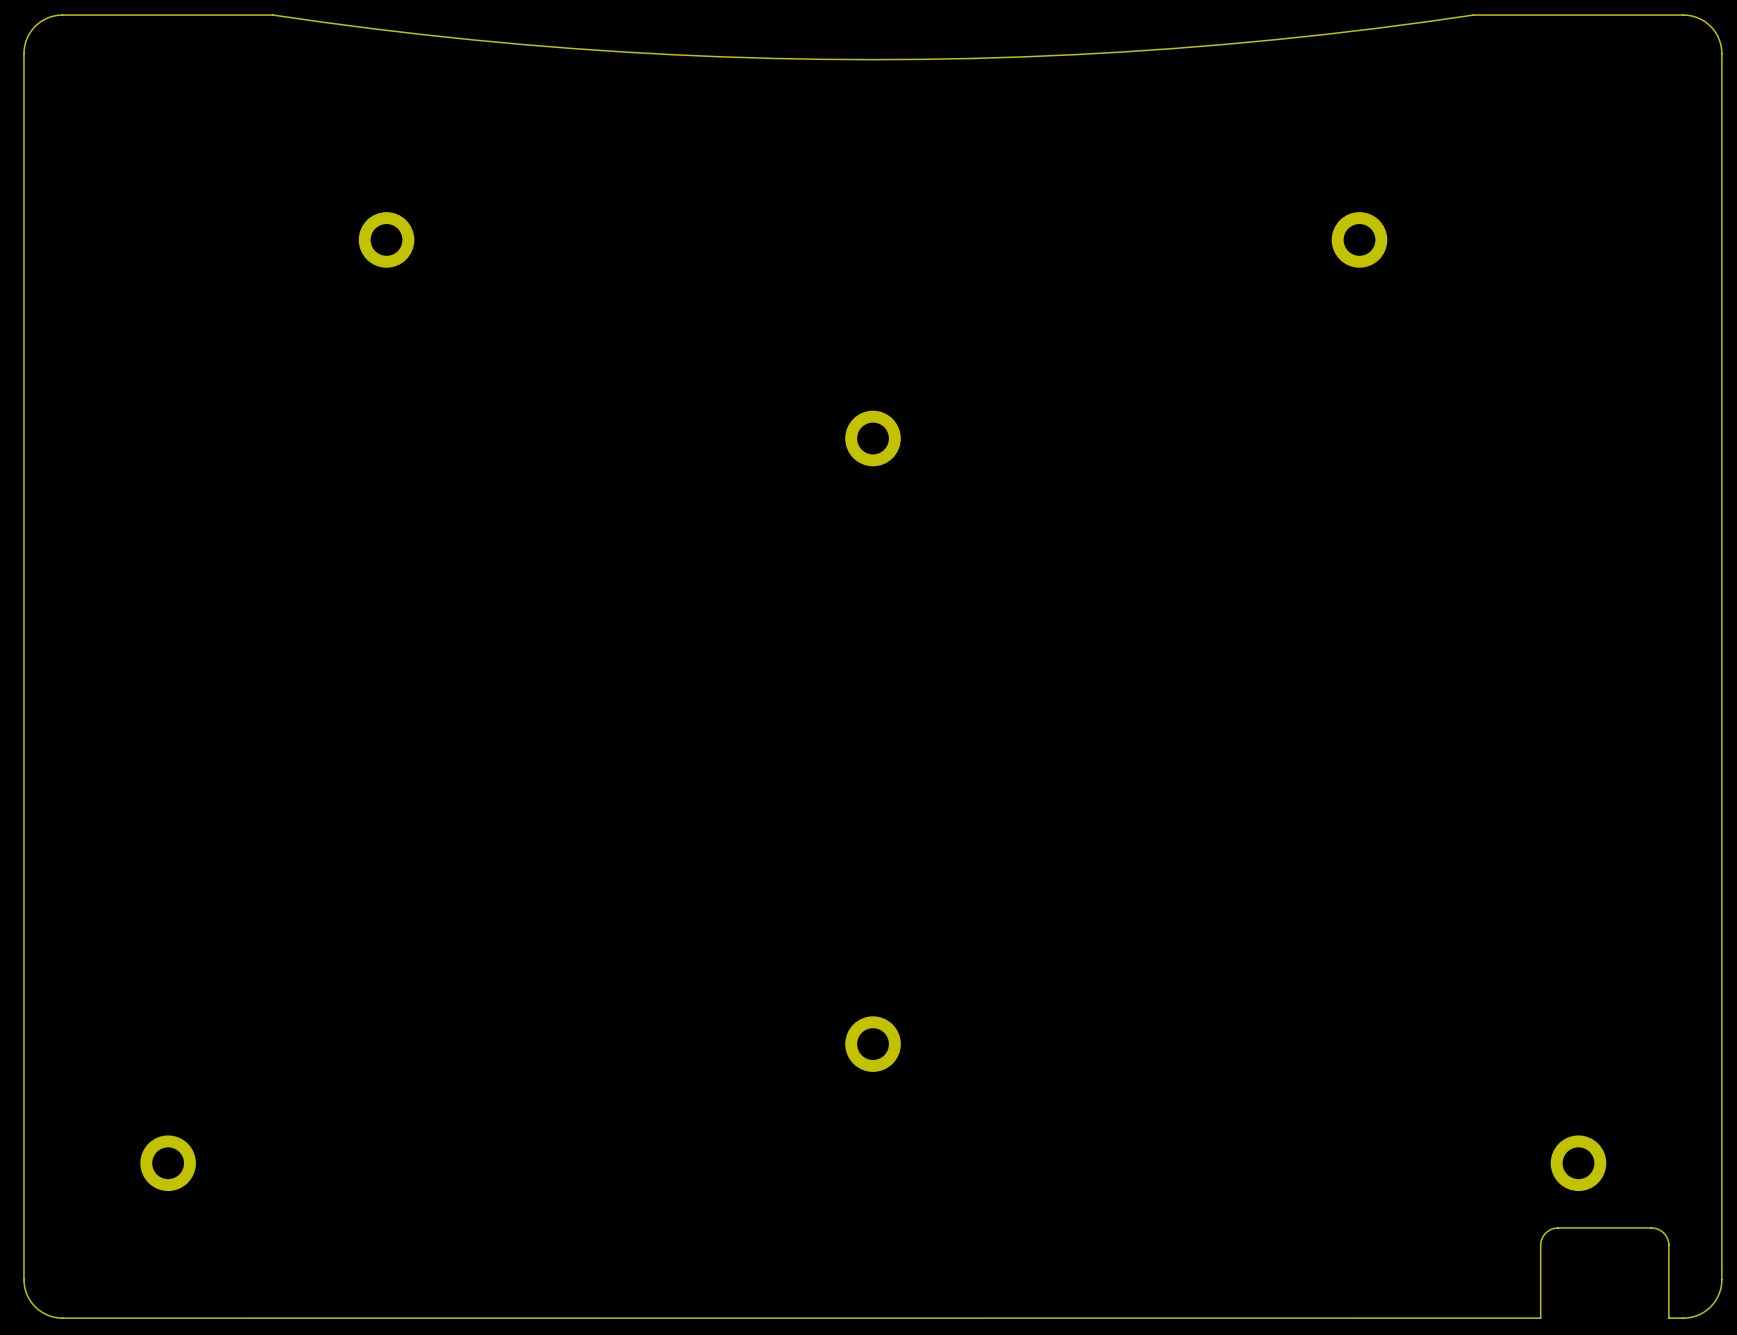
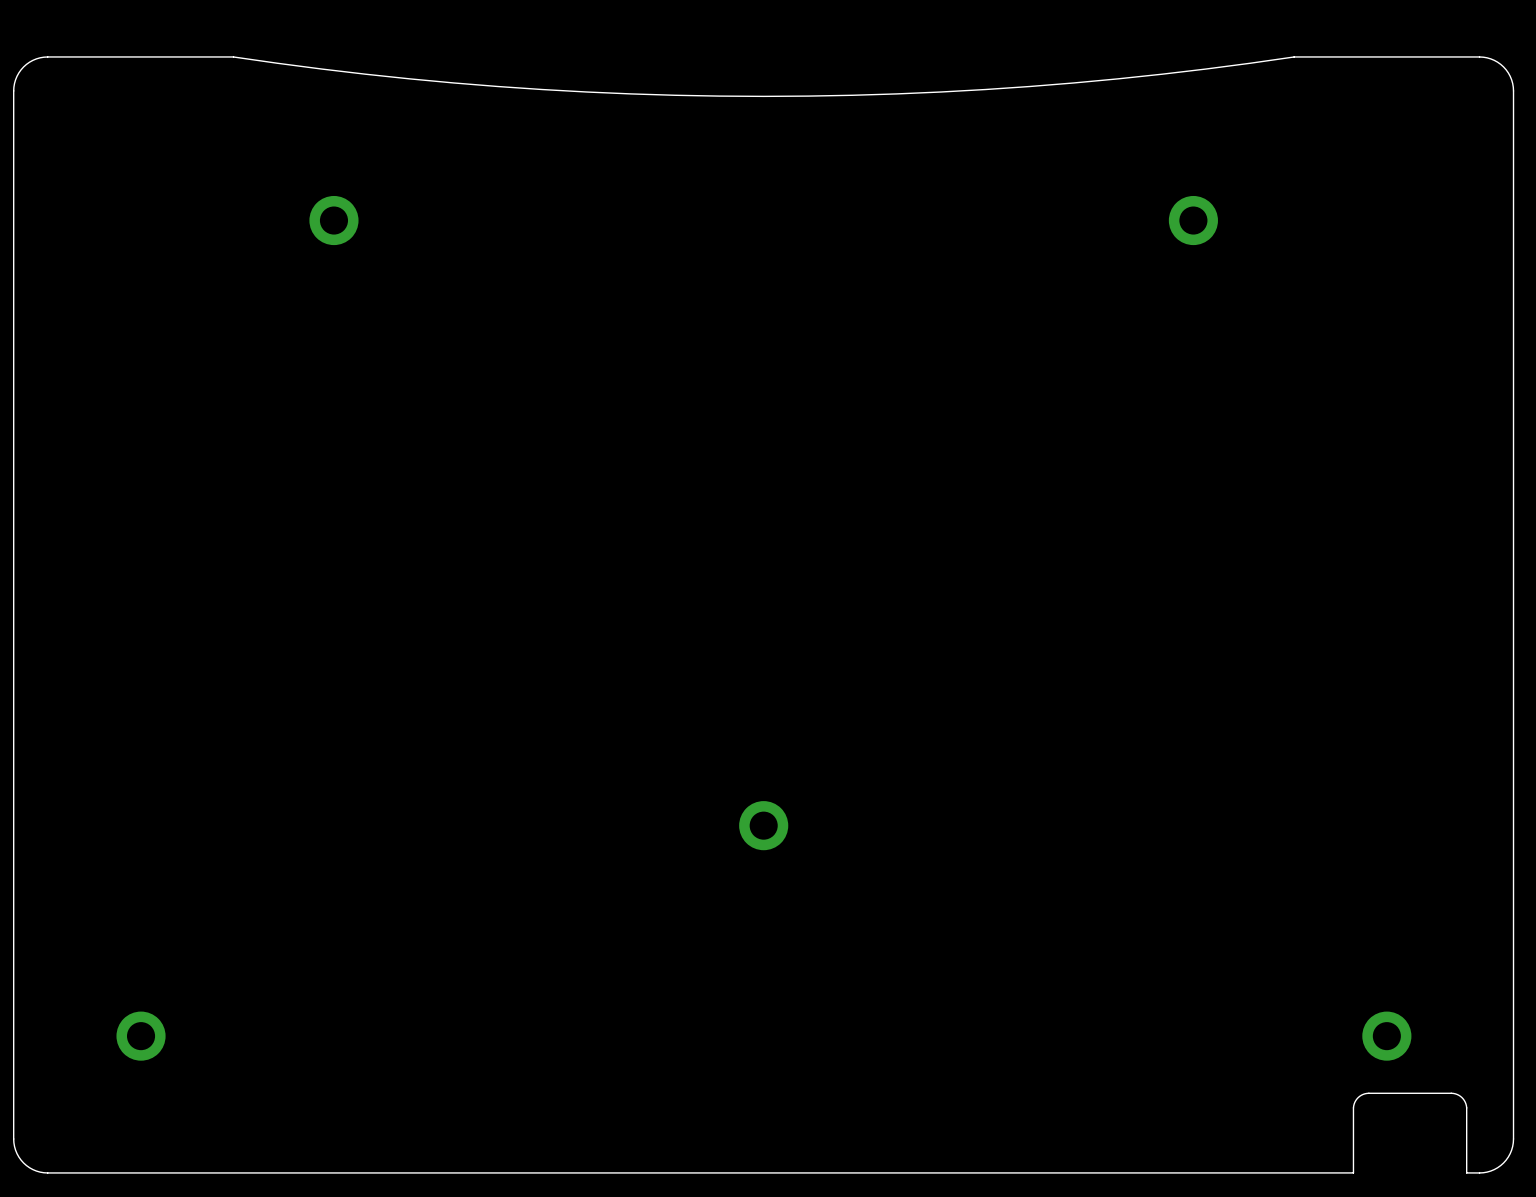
board edge: (23, 93) (24, 49) (27, 36) (41, 20) (62, 15) (272, 15) (422, 34) (572, 48) (722, 56) (873, 59) (1023, 56) (1174, 48) (1324, 34) (1473, 15) (1683, 15) (1703, 20) (1718, 36) (1721, 49) (1721, 93) -> (13, 90) (15, 79) (23, 66) (32, 60) (47, 56) (233, 56) (365, 74) (497, 86) (630, 93) (763, 96) (896, 93) (1029, 86) (1162, 74) (1294, 56) (1479, 56) (1490, 58) (1503, 66) (1510, 76) (1513, 90)
part: (873, 438) -> none
part position: (873, 1044) -> (763, 825)

